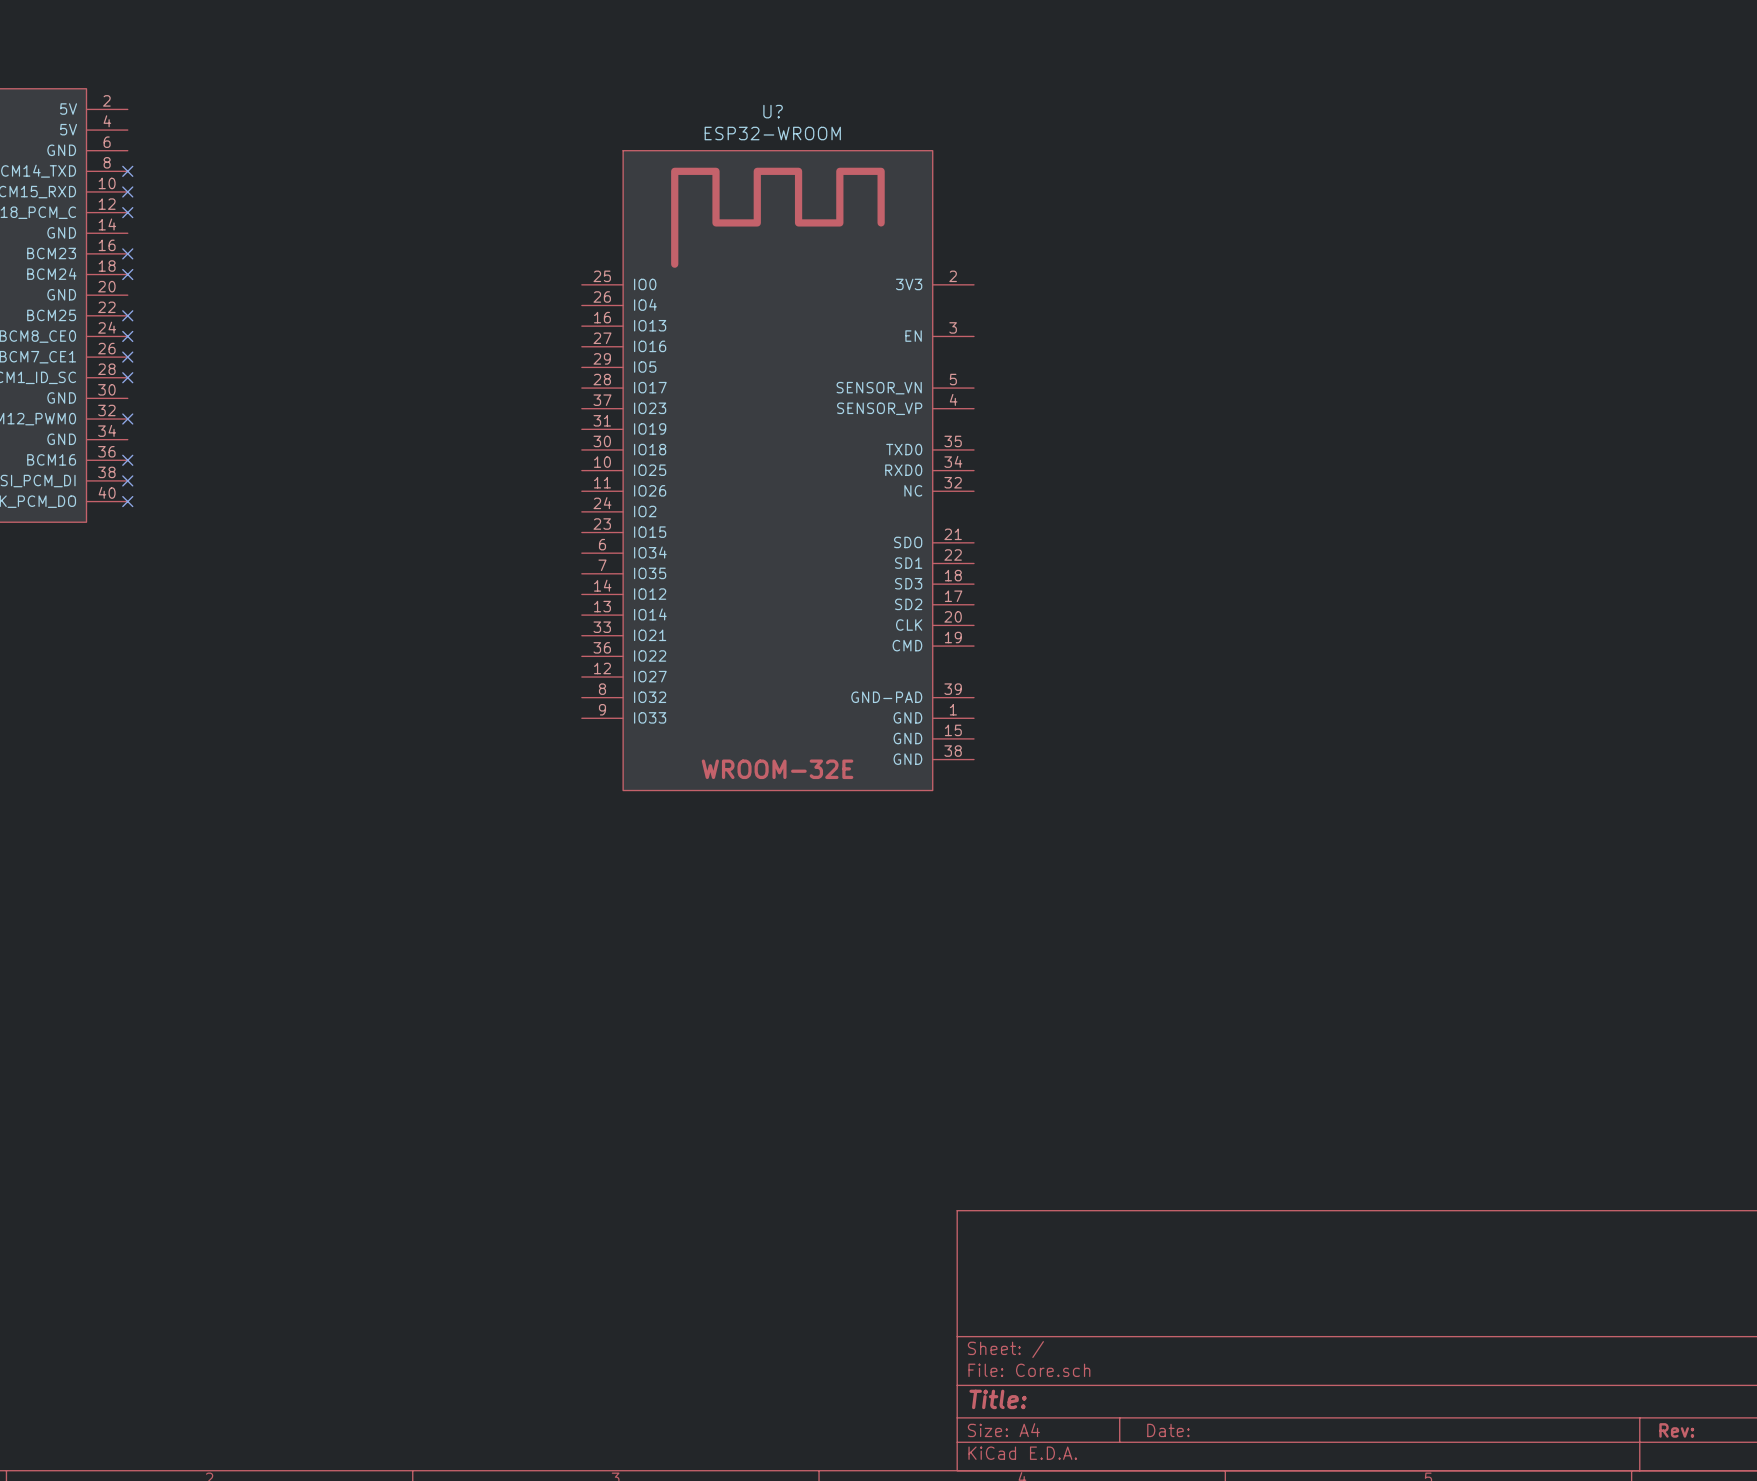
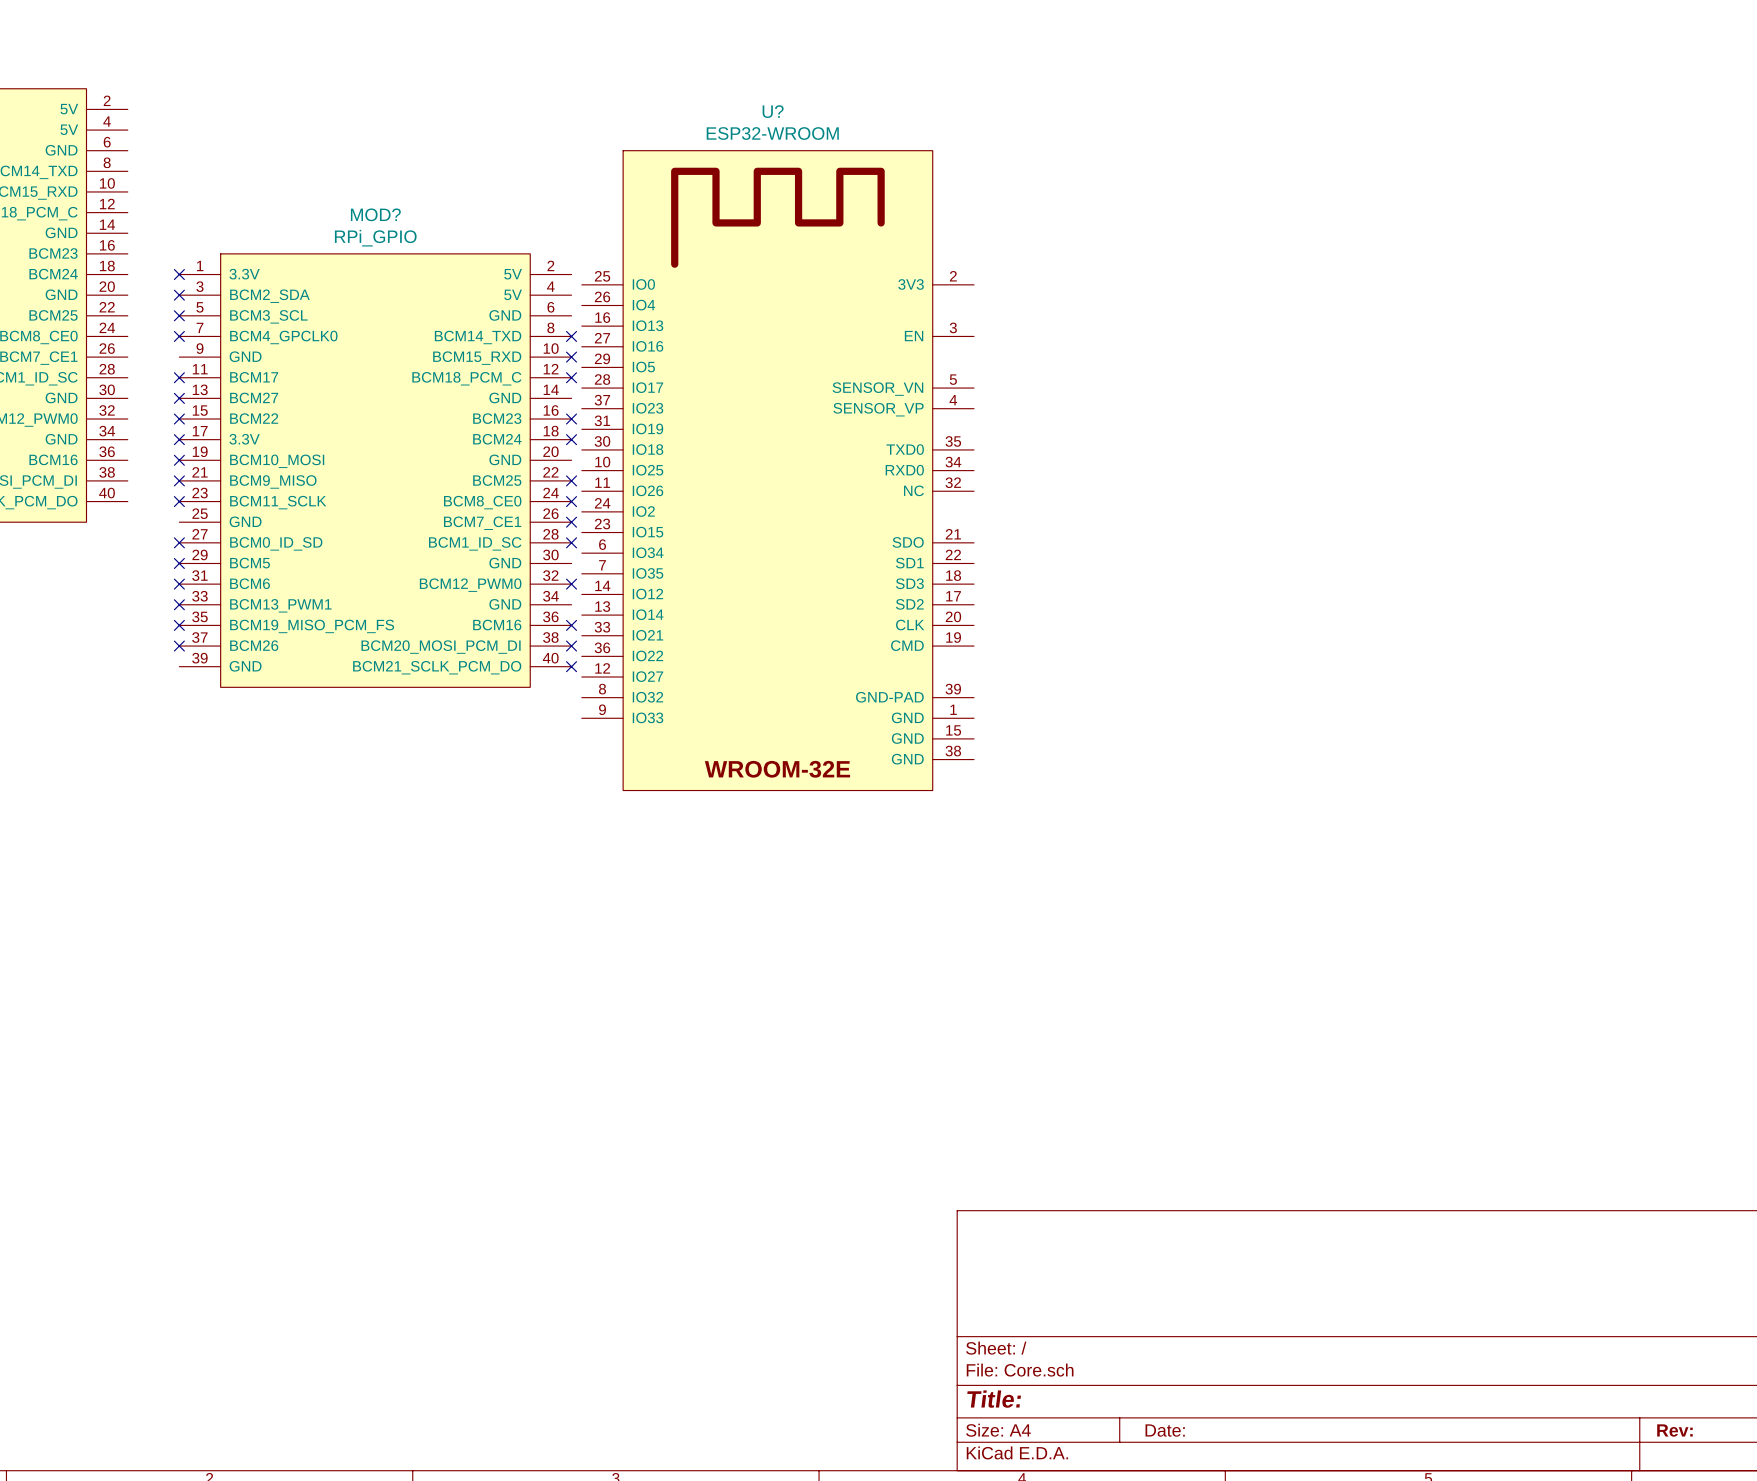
no-connect mark: (127, 171) -> none
no-connect mark: (127, 191) -> none
no-connect mark: (127, 212) -> none
no-connect mark: (127, 253) -> none
no-connect mark: (127, 274) -> none
no-connect mark: none -> (179, 274)
no-connect mark: none -> (179, 295)
no-connect mark: (127, 315) -> none
no-connect mark: none -> (179, 315)
no-connect mark: (127, 336) -> none
no-connect mark: none -> (179, 336)
no-connect mark: none -> (571, 336)
no-connect mark: (127, 357) -> none
no-connect mark: none -> (571, 357)
no-connect mark: (127, 377) -> none
no-connect mark: none -> (179, 377)
no-connect mark: none -> (571, 377)
no-connect mark: none -> (179, 398)
no-connect mark: (127, 419) -> none
no-connect mark: none -> (179, 419)
no-connect mark: none -> (571, 419)
no-connect mark: none -> (179, 439)
no-connect mark: none -> (571, 439)
no-connect mark: (127, 460) -> none
no-connect mark: none -> (179, 460)
MOD?: none -> RPi_GPIO (375, 470)
no-connect mark: (127, 480) -> none
no-connect mark: none -> (179, 480)
no-connect mark: none -> (571, 480)
no-connect mark: (127, 501) -> none
no-connect mark: none -> (179, 501)
no-connect mark: none -> (571, 501)
no-connect mark: none -> (571, 522)
no-connect mark: none -> (179, 542)
no-connect mark: none -> (571, 542)
no-connect mark: none -> (179, 563)
no-connect mark: none -> (179, 584)
no-connect mark: none -> (571, 584)
no-connect mark: none -> (179, 604)
no-connect mark: none -> (179, 625)
no-connect mark: none -> (571, 625)
no-connect mark: none -> (179, 646)
no-connect mark: none -> (571, 646)
no-connect mark: none -> (571, 666)

